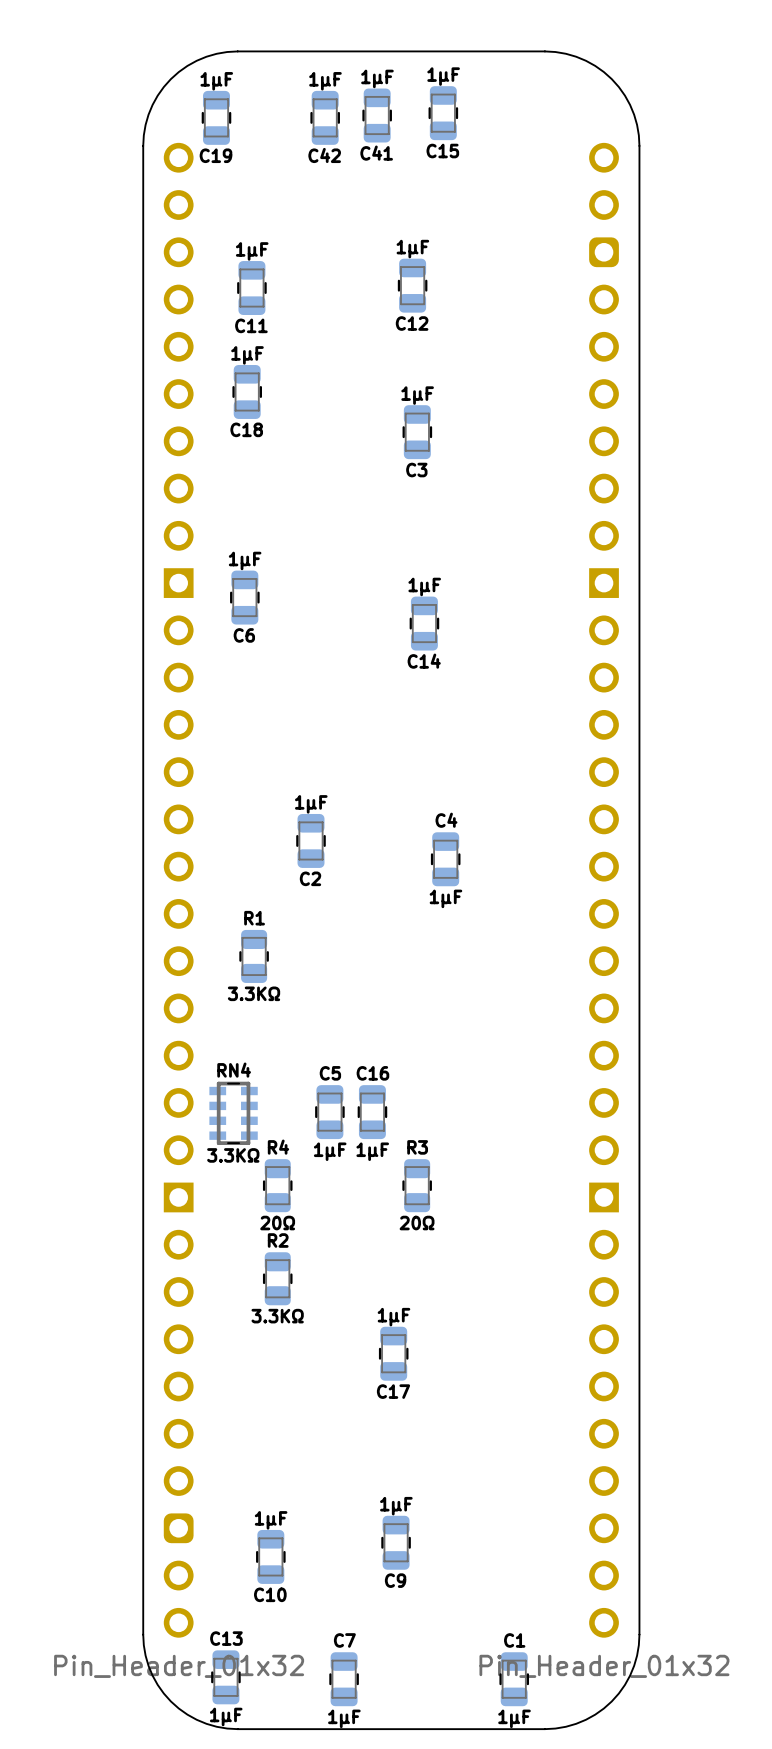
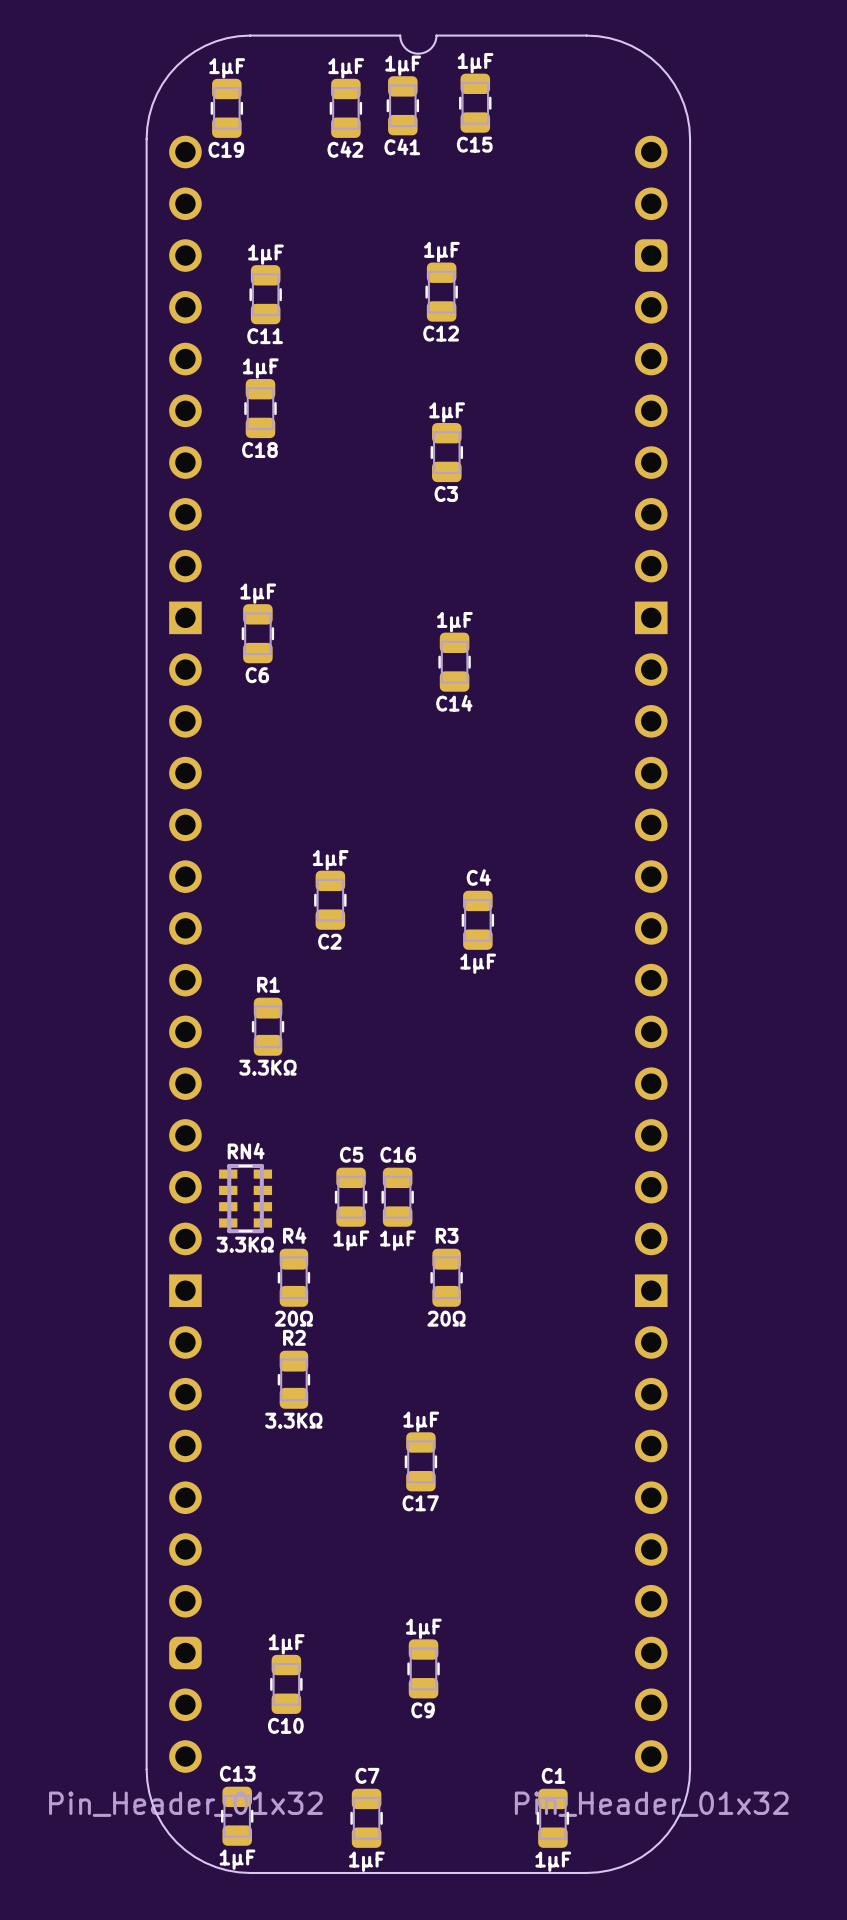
part footprint: [142, 50, 641, 1731] -> [145, 34, 692, 1875]

